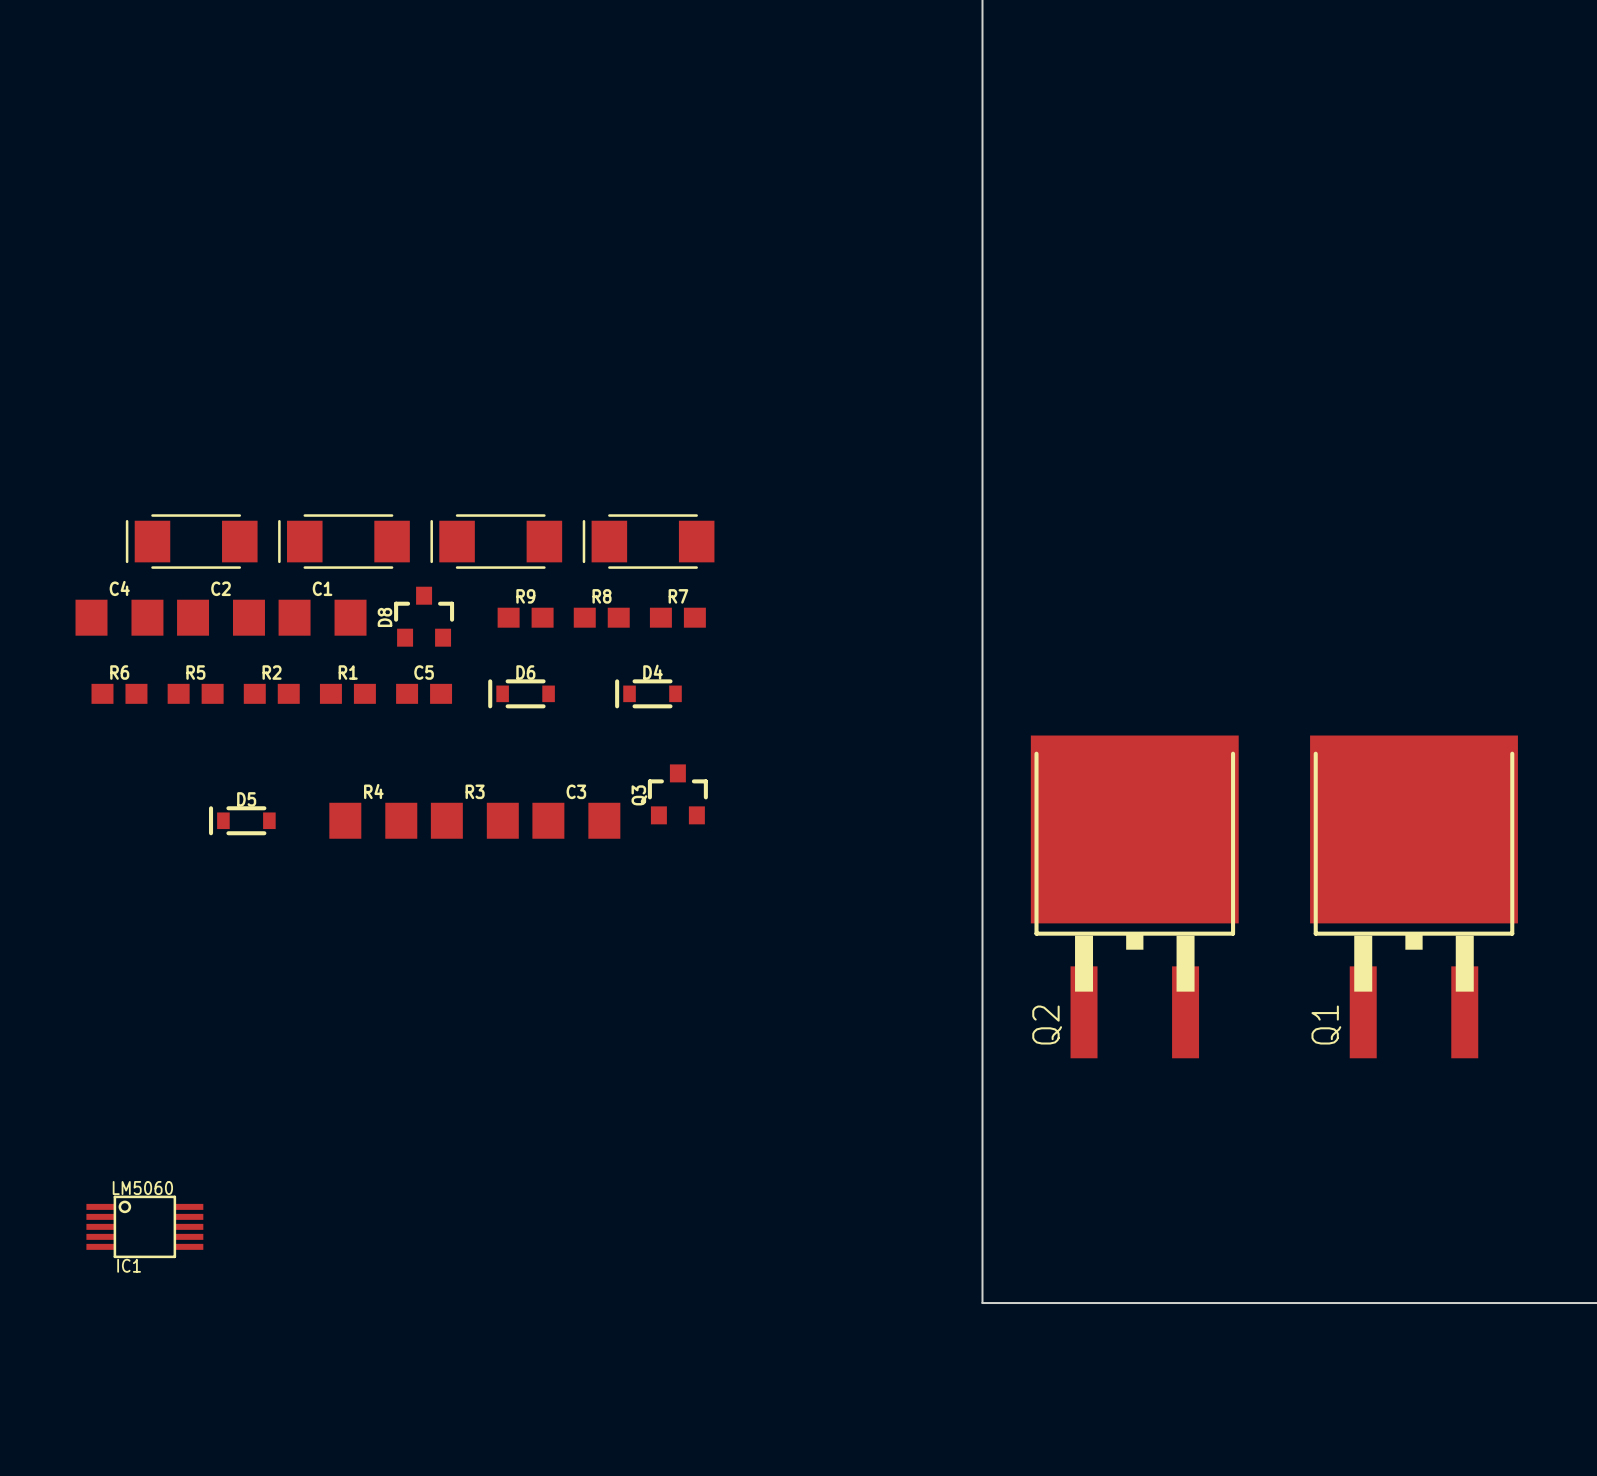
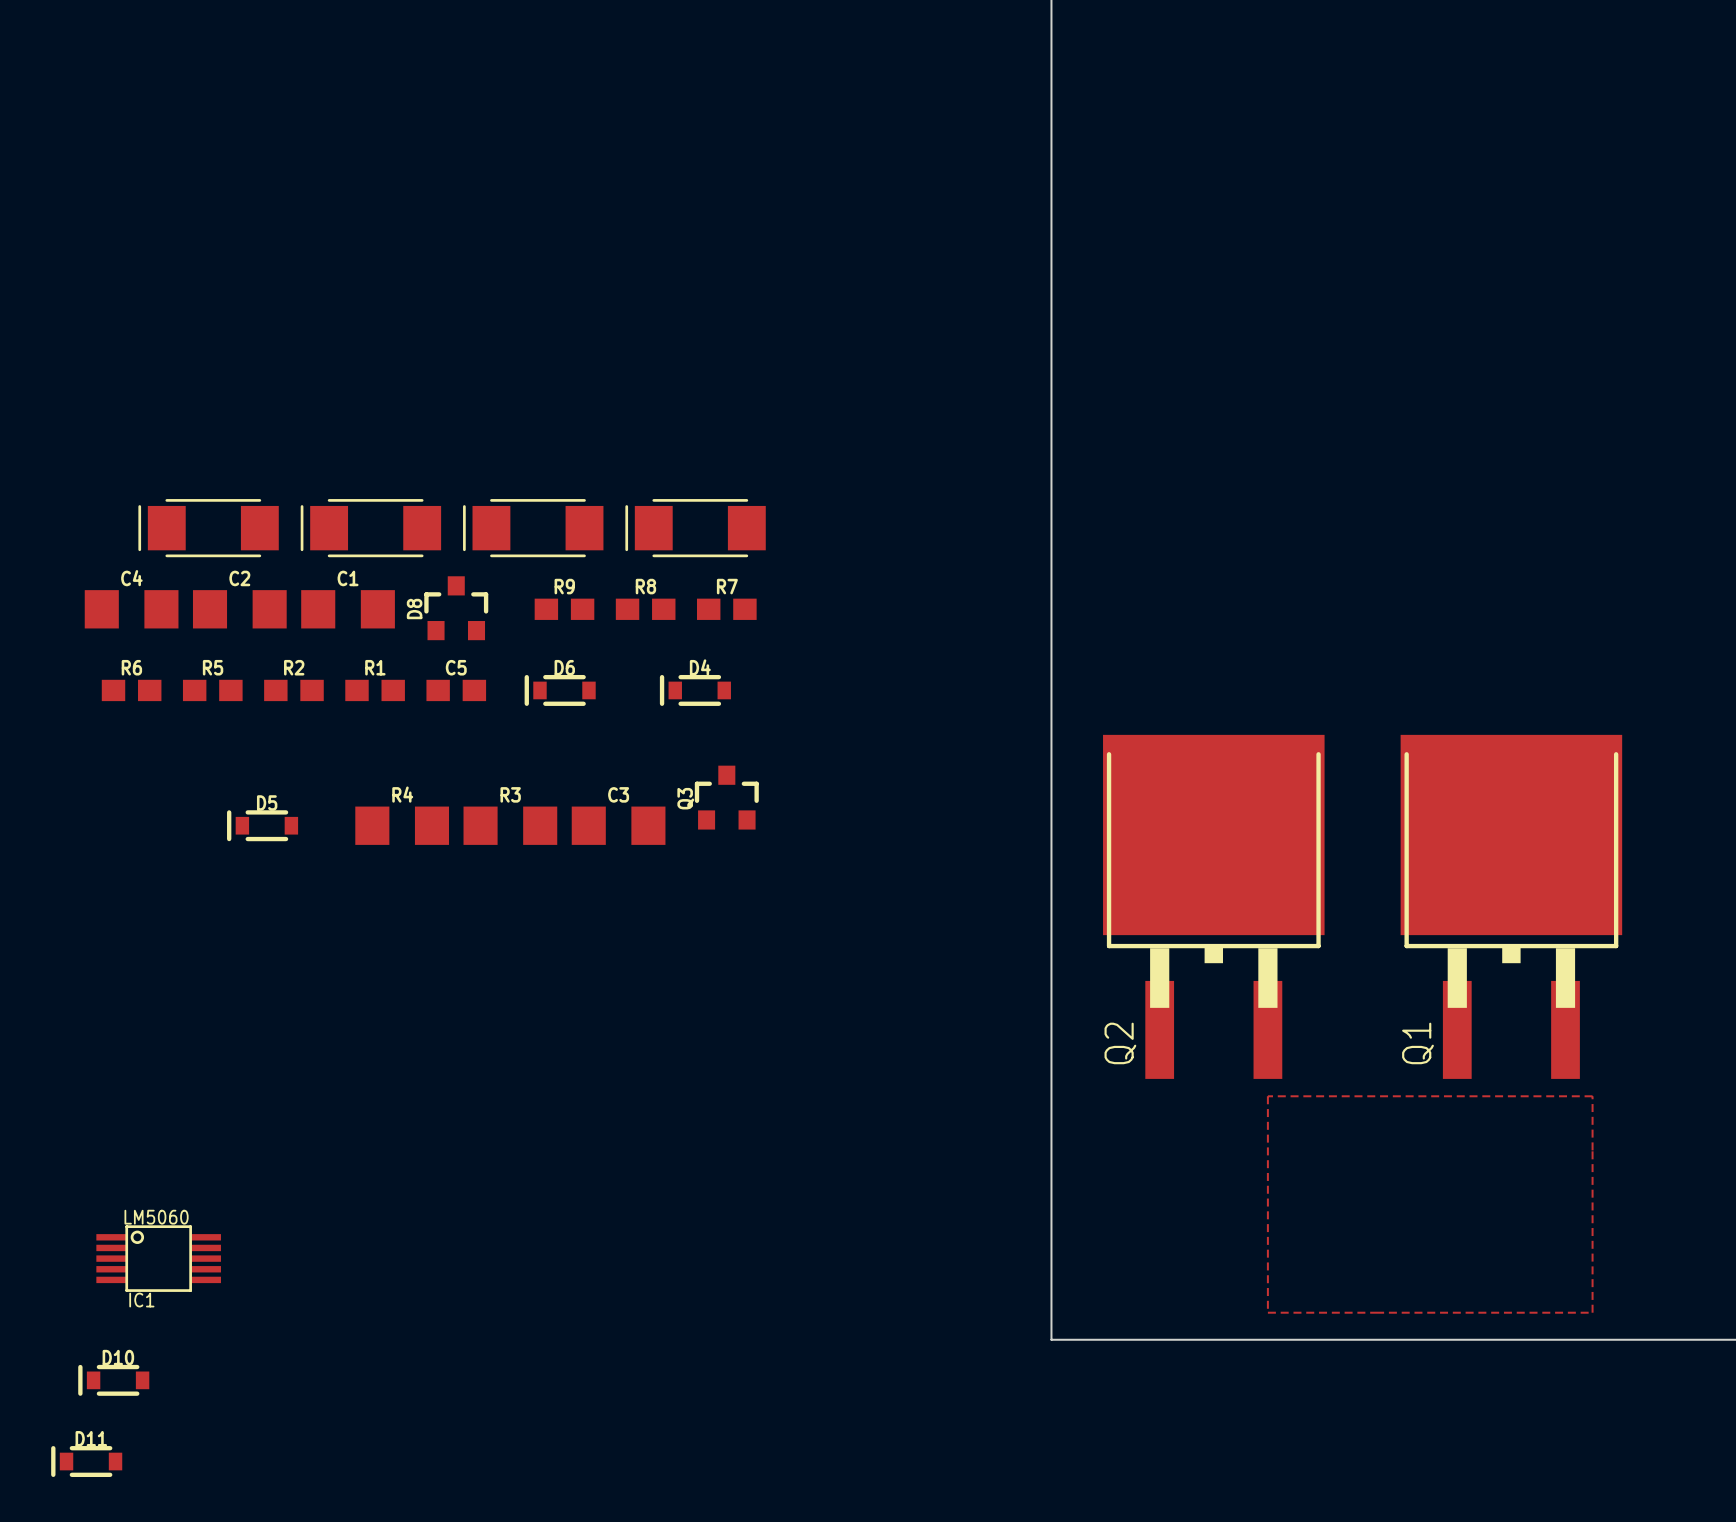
zone outline: none -> (1267, 1096) (1592, 1096) (1592, 1312) (1267, 1312) (1267, 1096)
D10: none -> (113, 1380)
D11: none -> (86, 1461)

